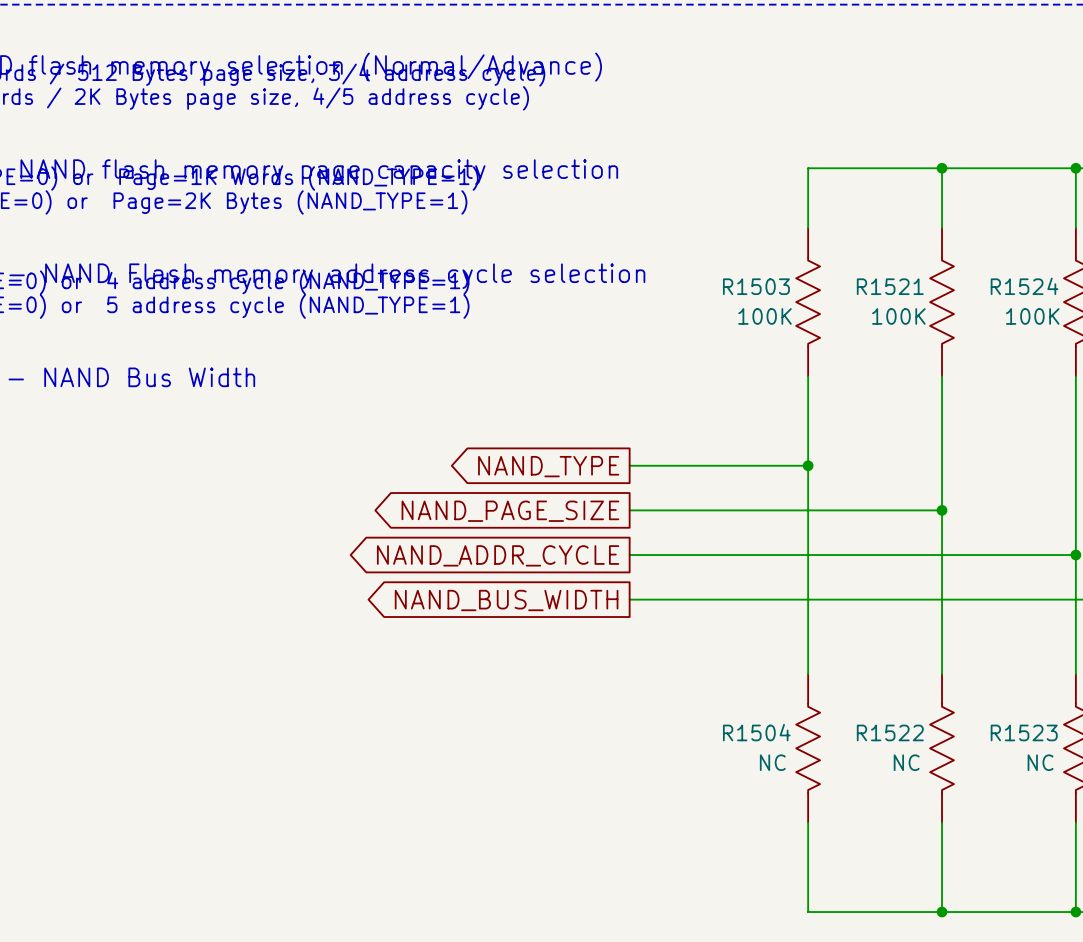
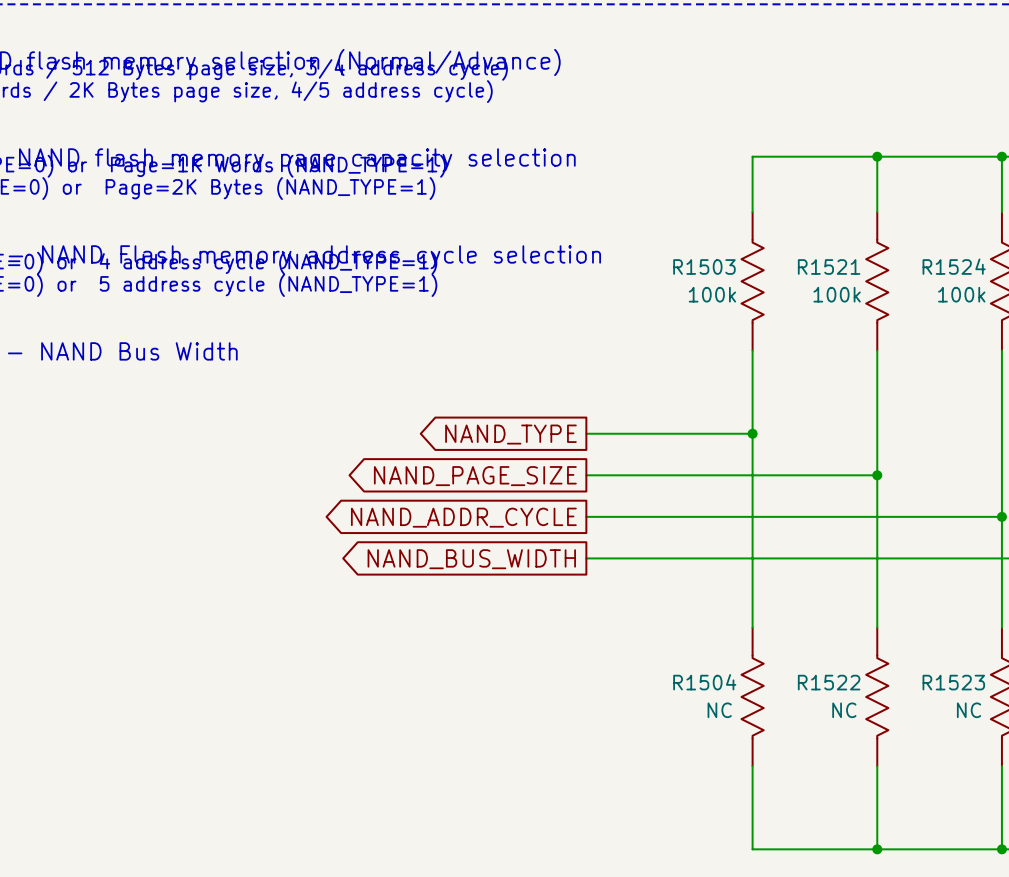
R1503 value: 100K (765, 316) -> 100k (712, 294)
R1521 value: 100K (898, 316) -> 100k (837, 294)
R1524 value: 100K (1032, 316) -> 100k (961, 294)

